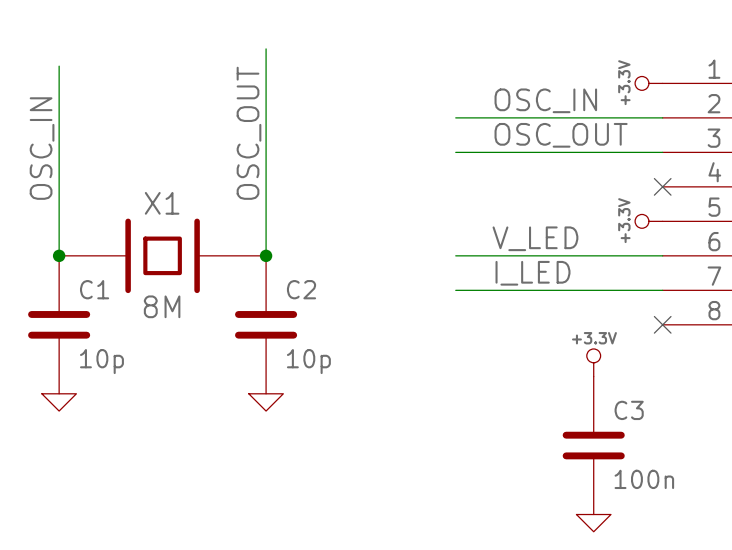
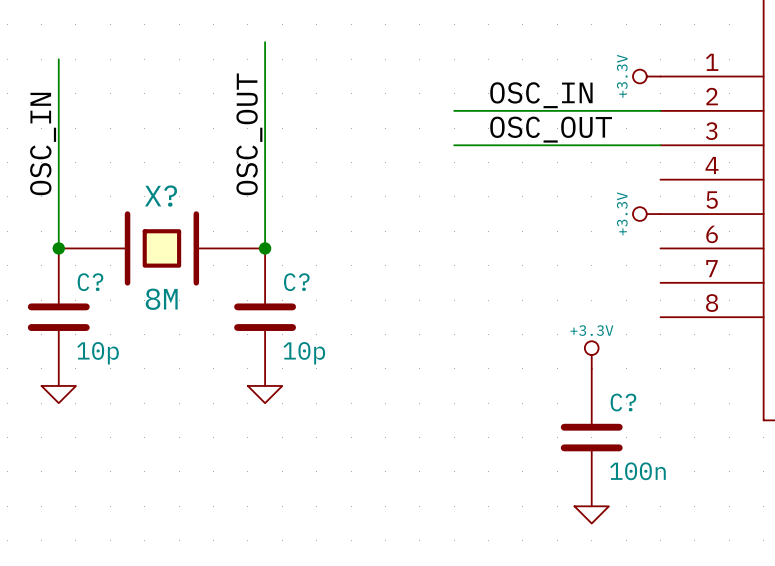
no-connect mark: (662, 186) -> none
X1 name: X1 (162, 203) -> X? (160, 196)
label: V_LED (535, 238) -> none
wire: (455, 255) (662, 255) -> none
label: I_LED (532, 273) -> none
C1 name: C1 (94, 289) -> C? (90, 282)
C2 name: C2 (301, 289) -> C? (296, 282)
wire: (455, 290) (662, 290) -> none
no-connect mark: (662, 324) -> none
C3 name: C3 (629, 410) -> C? (623, 402)

